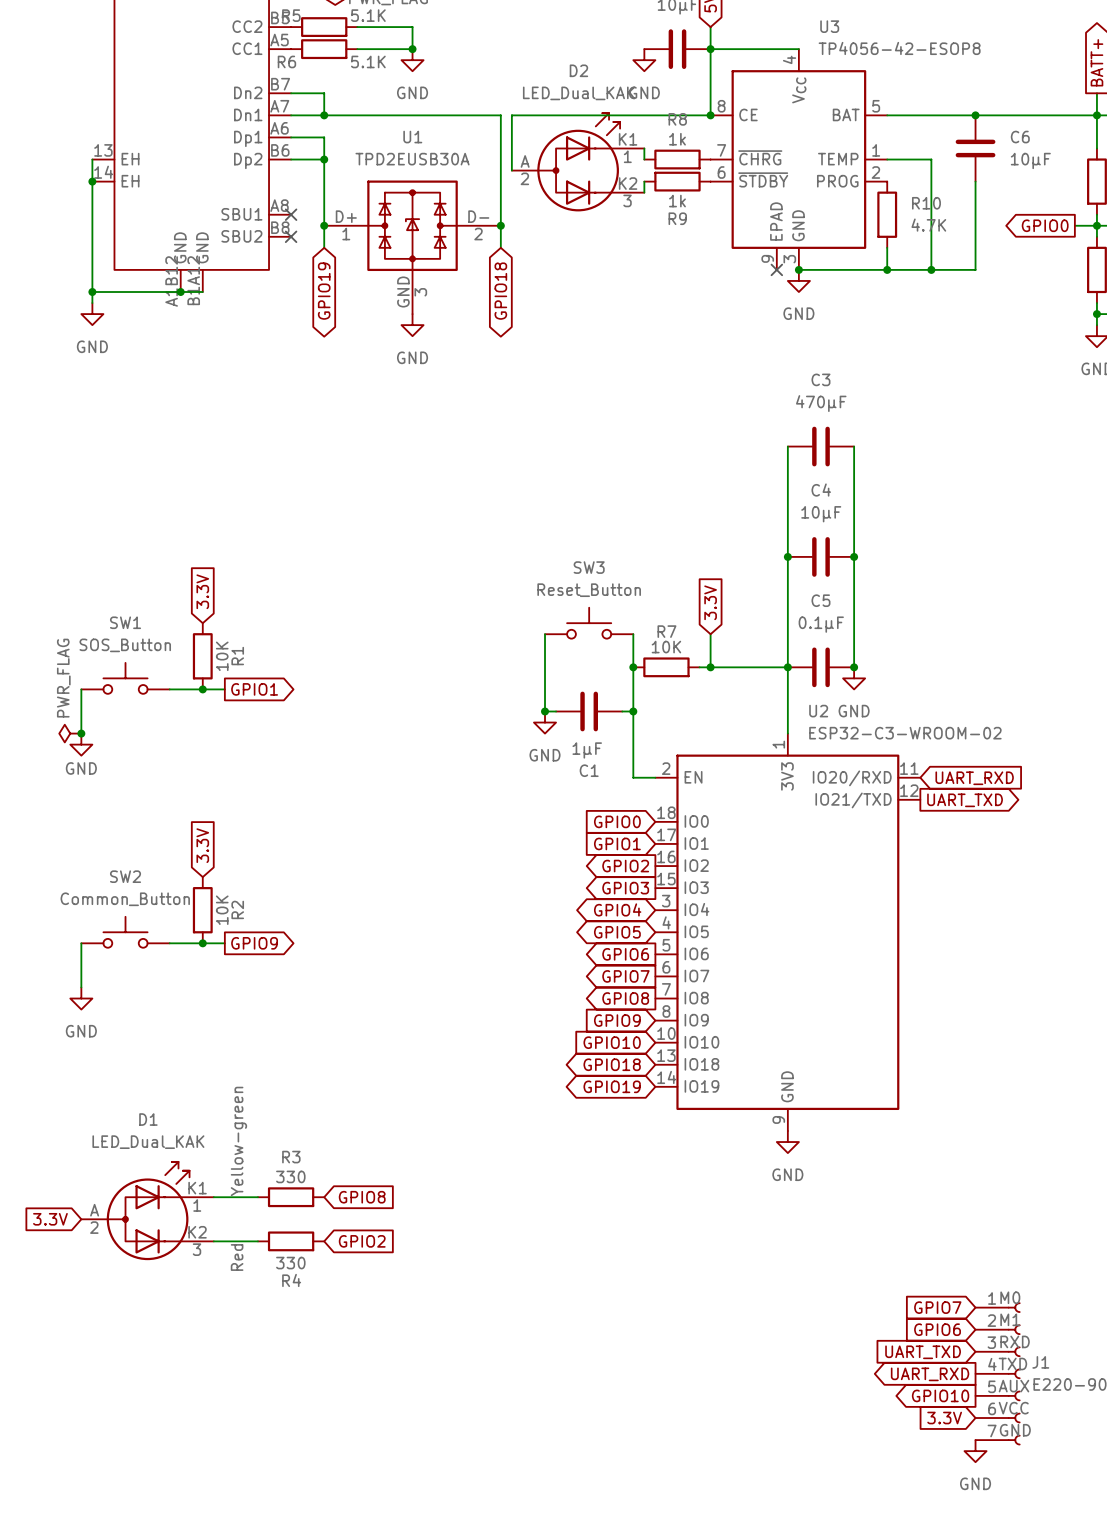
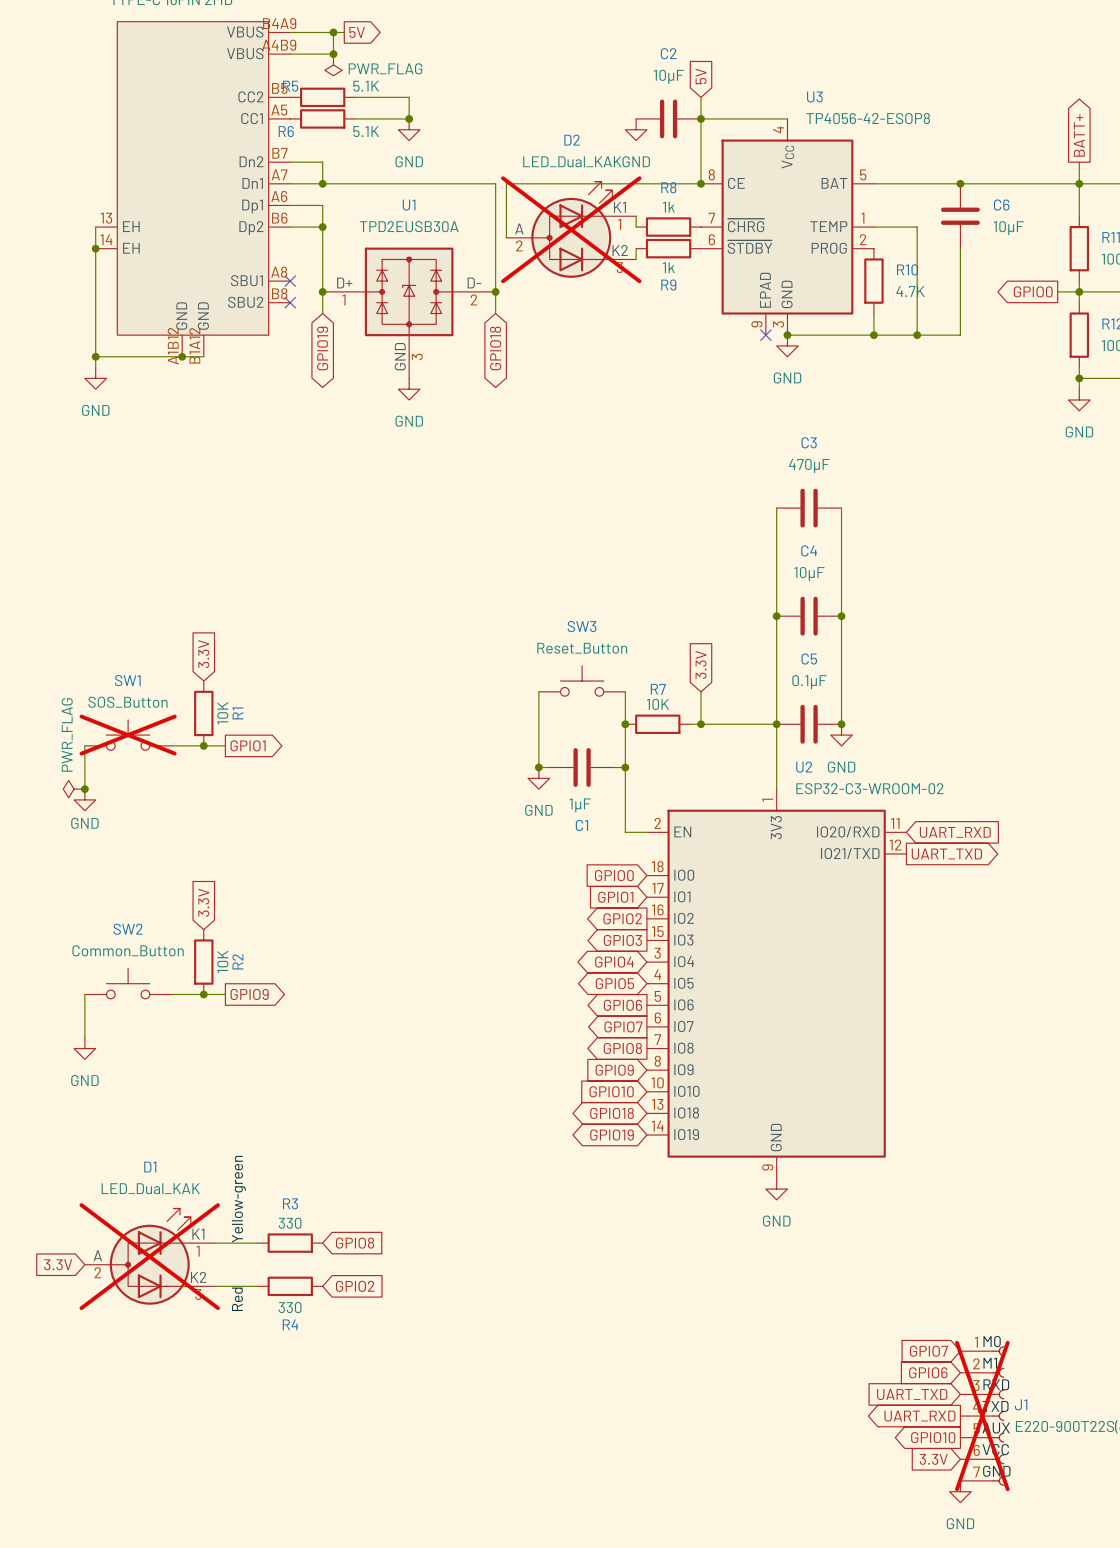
D2 do-not-place cross: none -> (571, 229)
SW1 do-not-place cross: none -> (128, 735)
D1 do-not-place cross: none -> (149, 1256)
J1 do-not-place cross: none -> (982, 1416)

